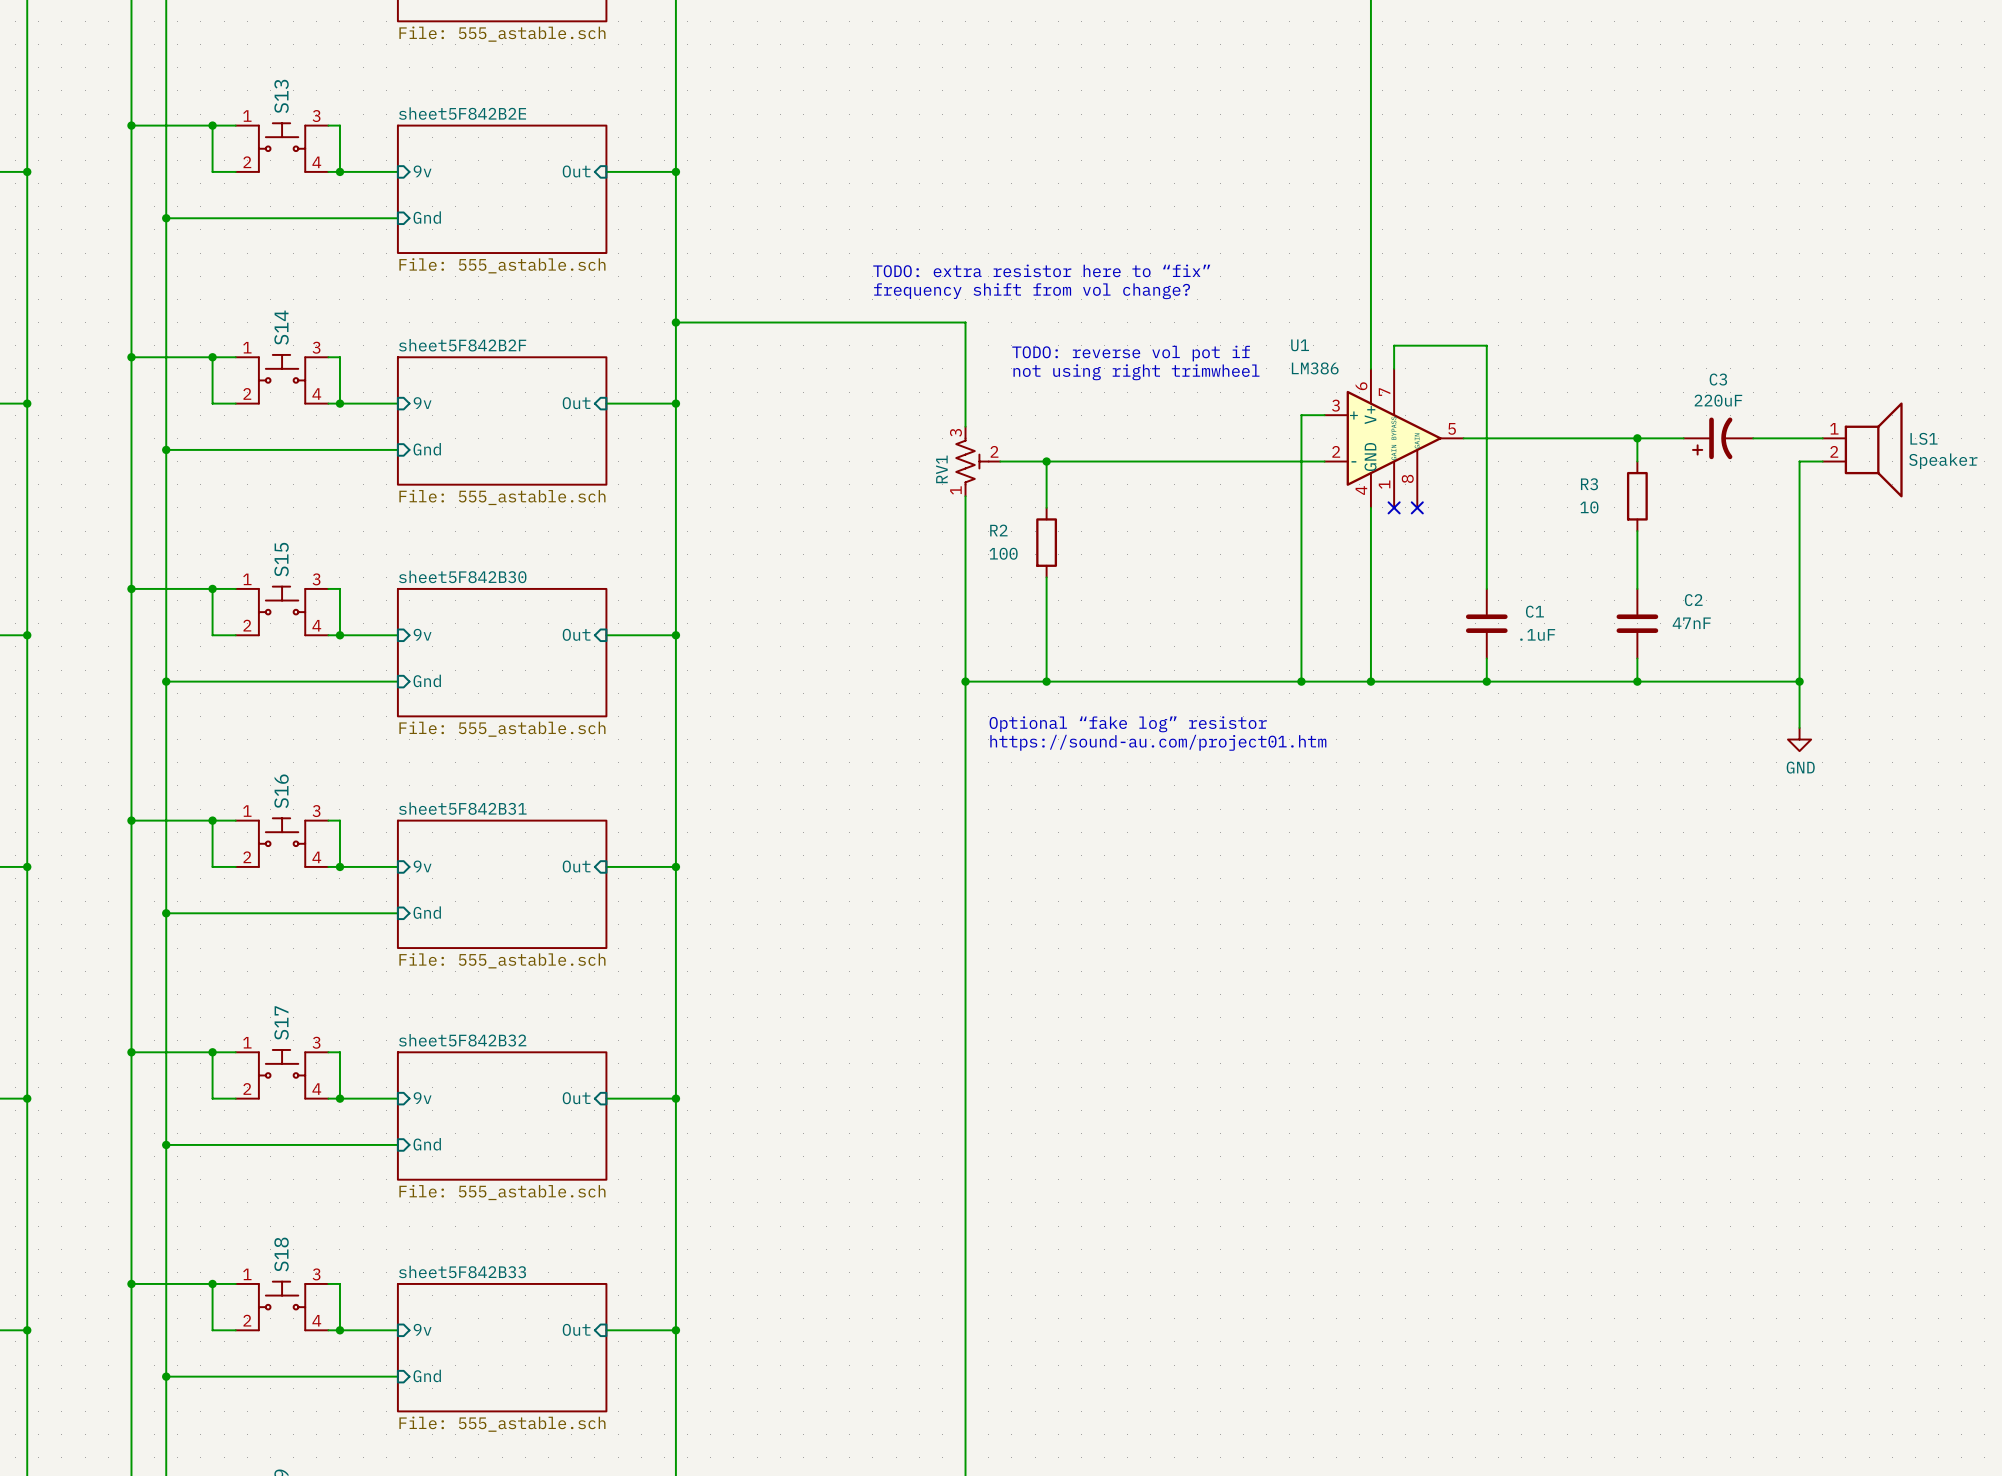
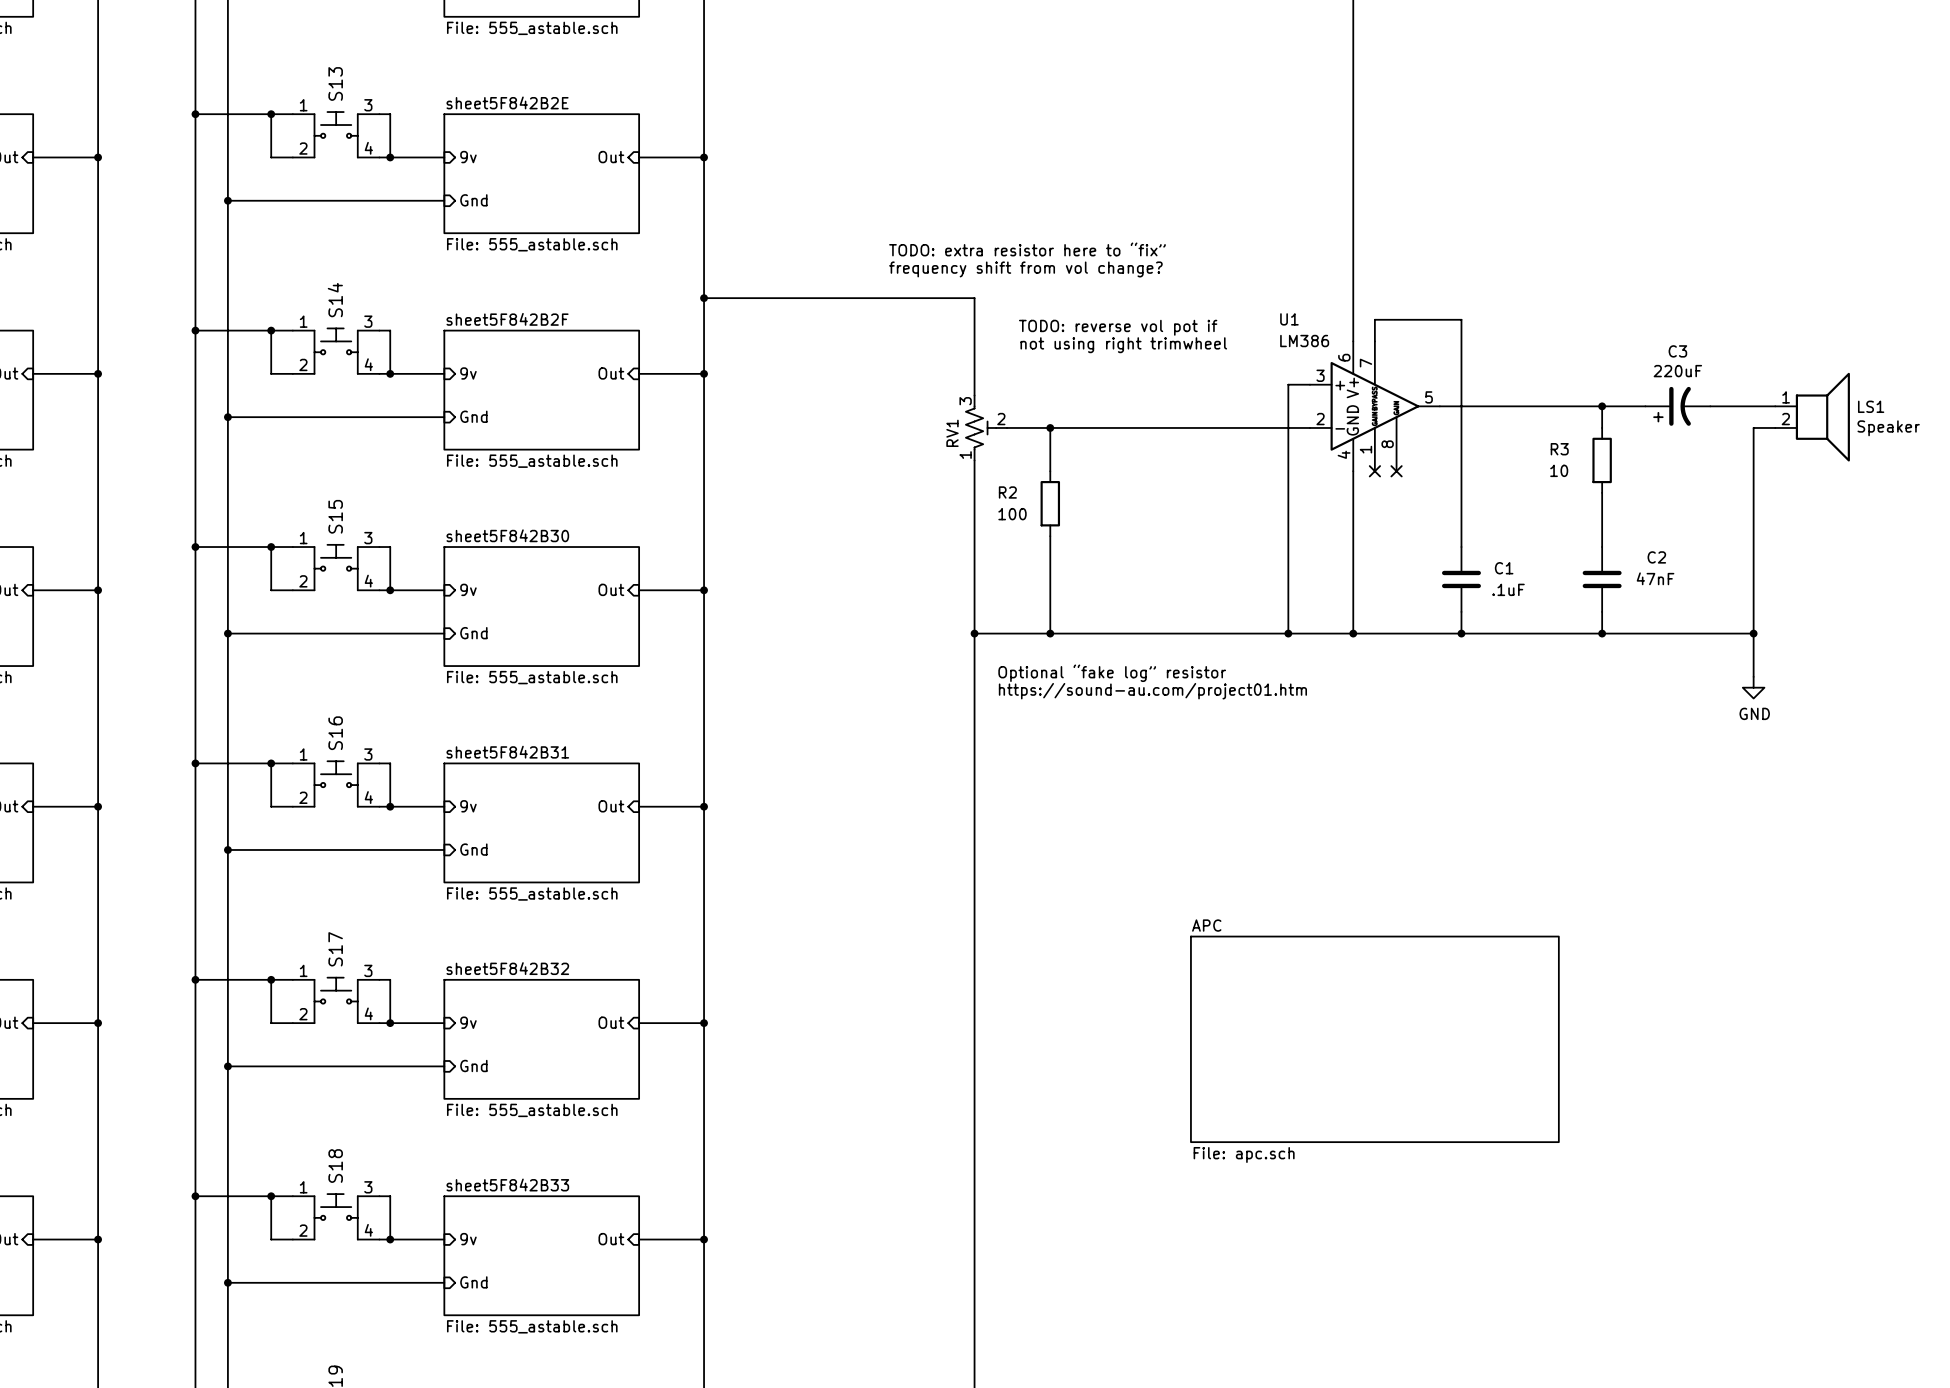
sheet APC: none -> File: apc.sch (1374, 1039)

